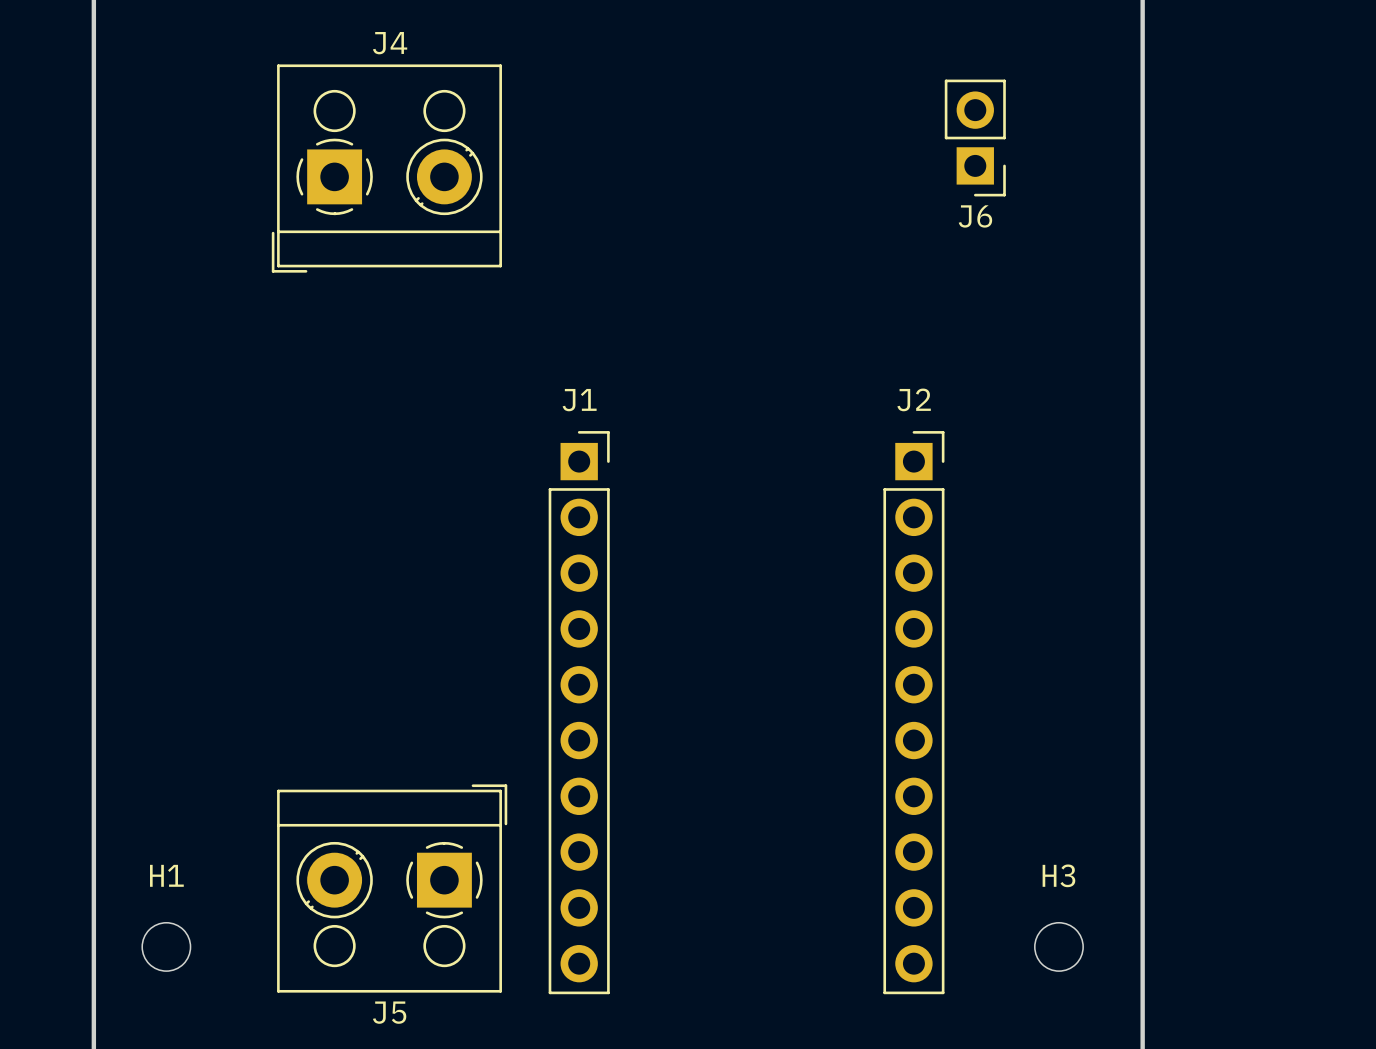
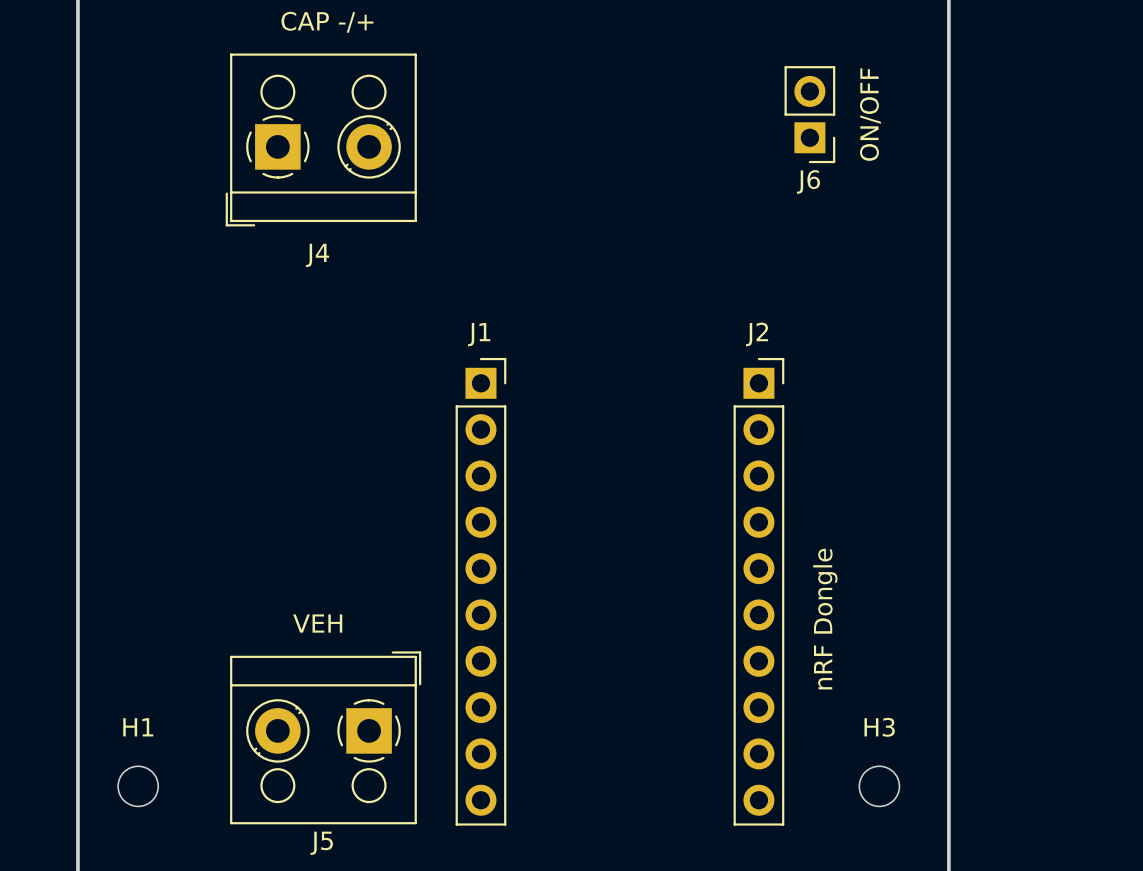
text: none -> CAP -/+ (327, 22)
J4 name position: J4 (390, 43) -> J4 (317, 255)
text: none -> ON/OFF (870, 114)
text: none -> nRF Dongle (825, 619)
text: none -> VEH (317, 623)

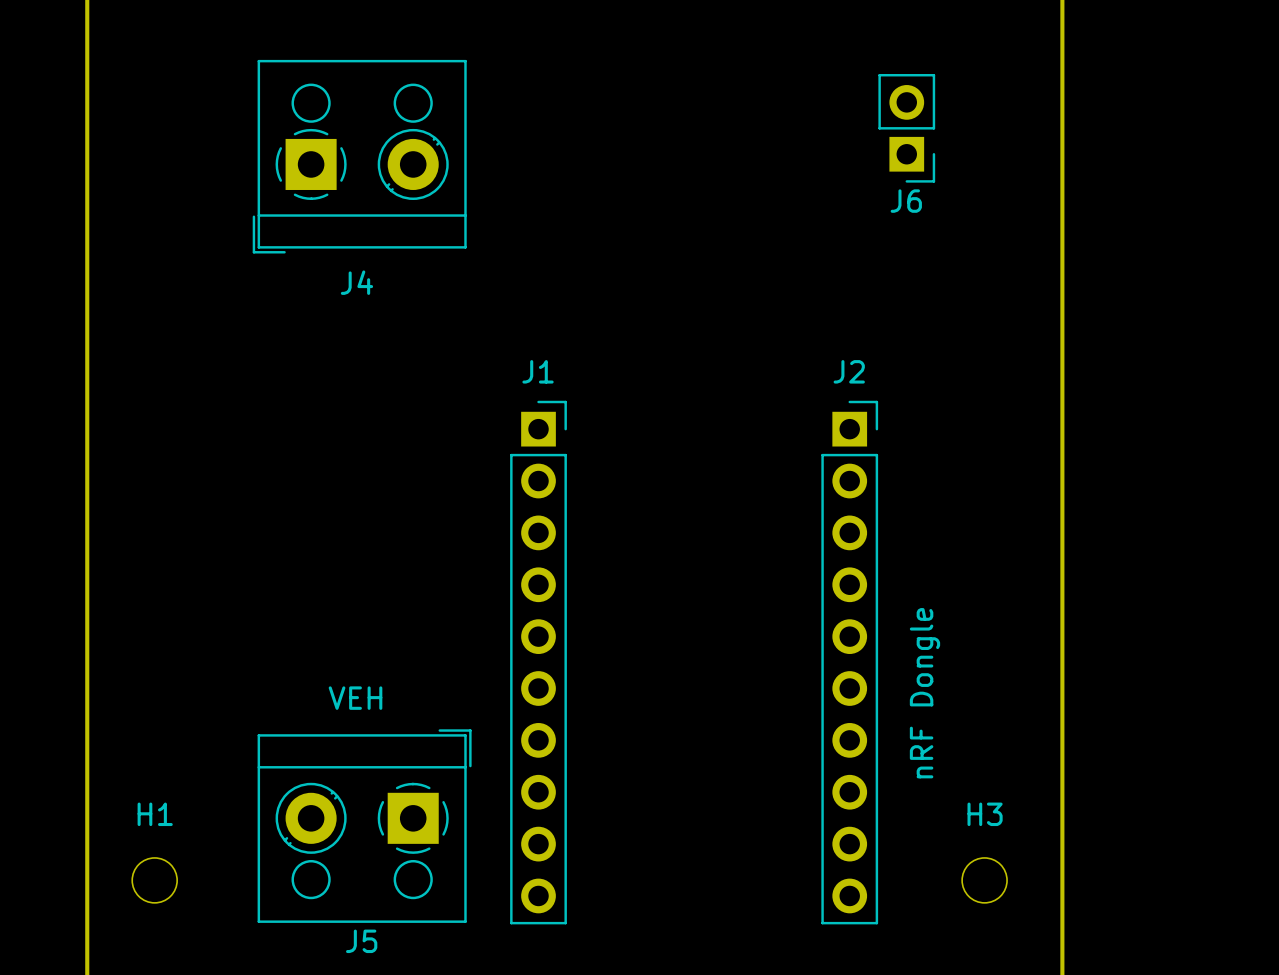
text: CAP -/+ (327, 22) -> none
text: ON/OFF (870, 114) -> none

